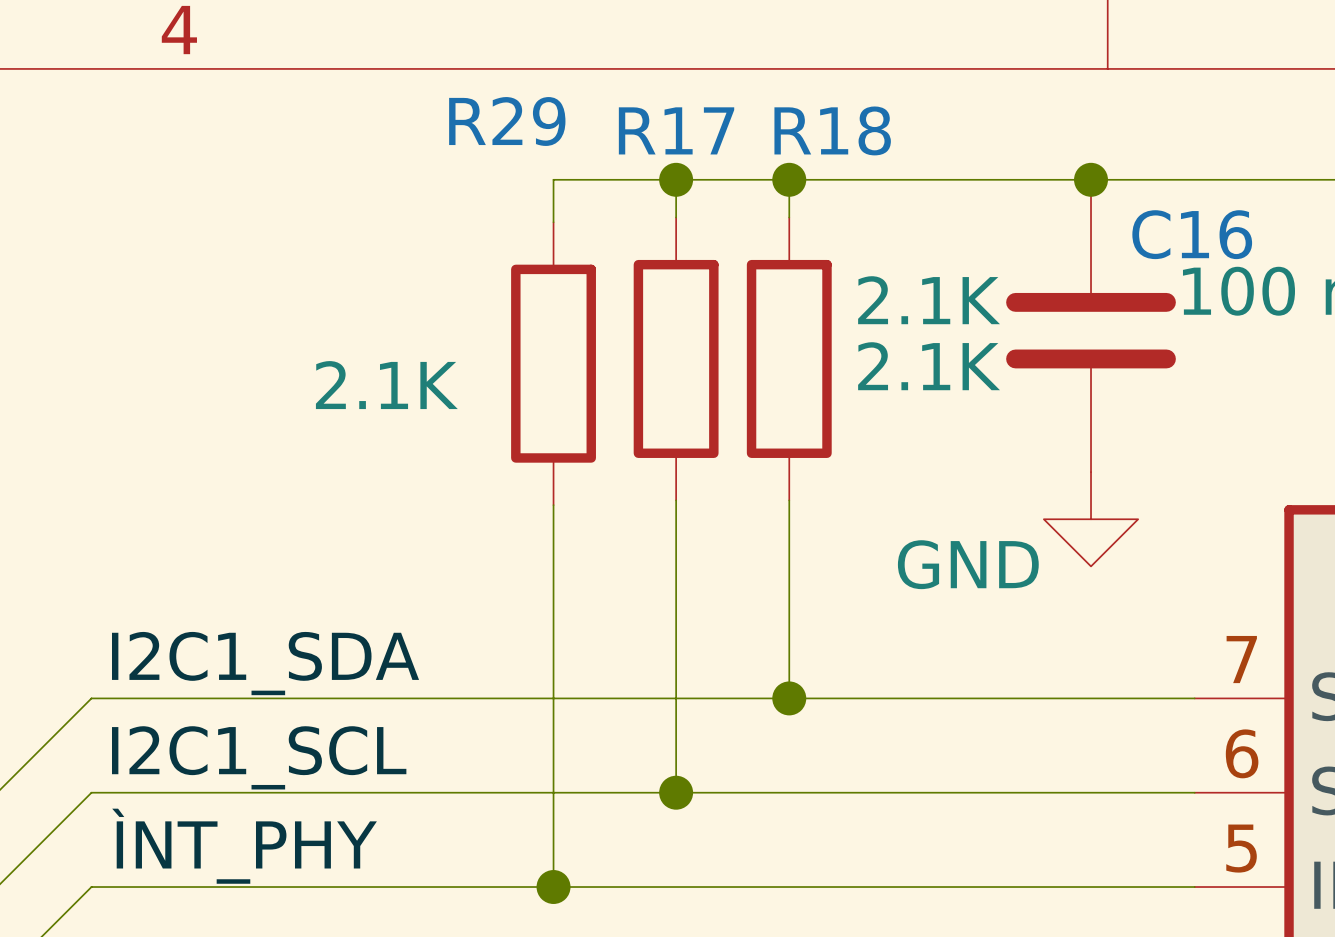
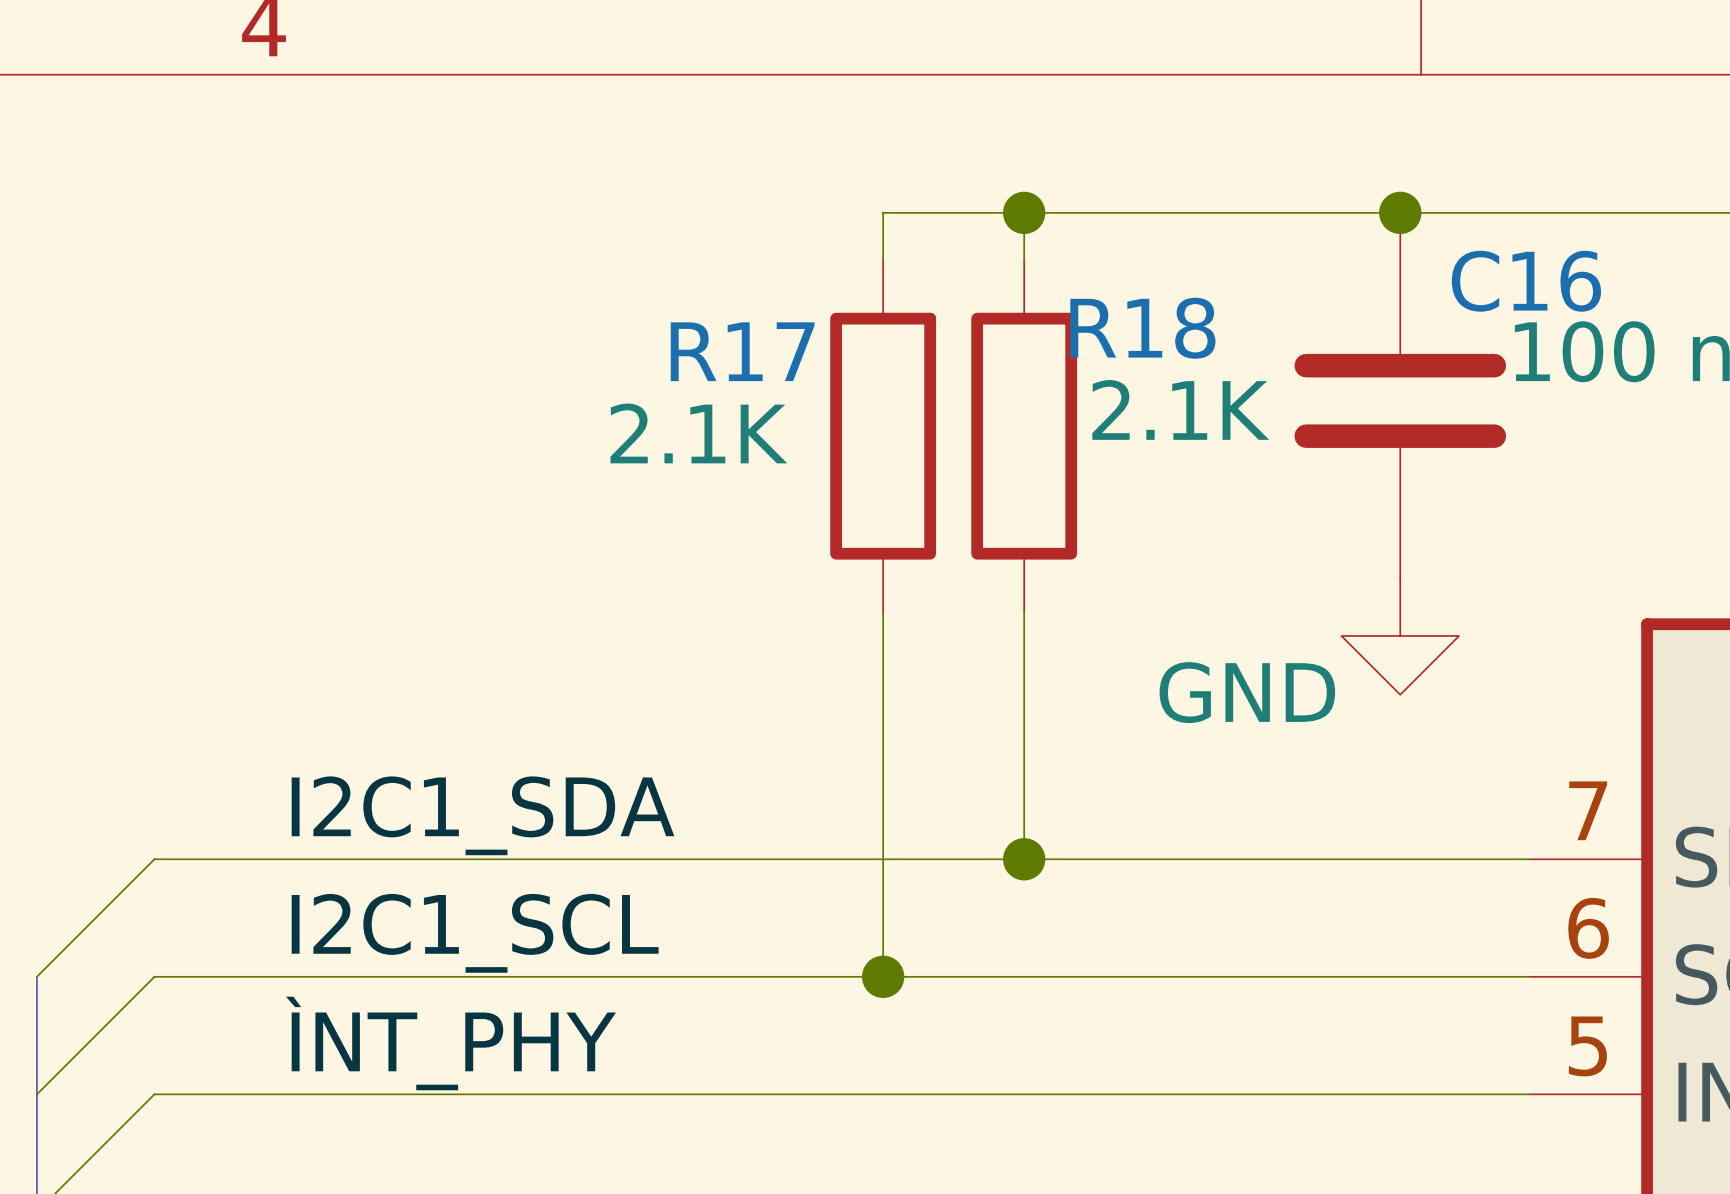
R17 name position: R17 (676, 130) -> R17 (742, 351)
R18 name position: R18 (832, 130) -> R18 (1142, 328)
wire: (676, 179) (553, 179) (553, 222) -> none
junction: (676, 179) -> none
R18 value position: 2.1K (929, 300) -> 2.1K (1180, 409)
R29: 2.1K (553, 363) -> none
R17 value position: 2.1K (929, 366) -> 2.1K (698, 433)
wire: (553, 505) (553, 887) -> none
label position: I2C1_SDA (265, 663) -> I2C1_SDA (483, 815)
label position: I2C1_SCL (259, 757) -> I2C1_SCL (475, 933)
label position: ÌNT_PHY (244, 846) -> ÌNT_PHY (451, 1043)
junction: (553, 887) -> none

